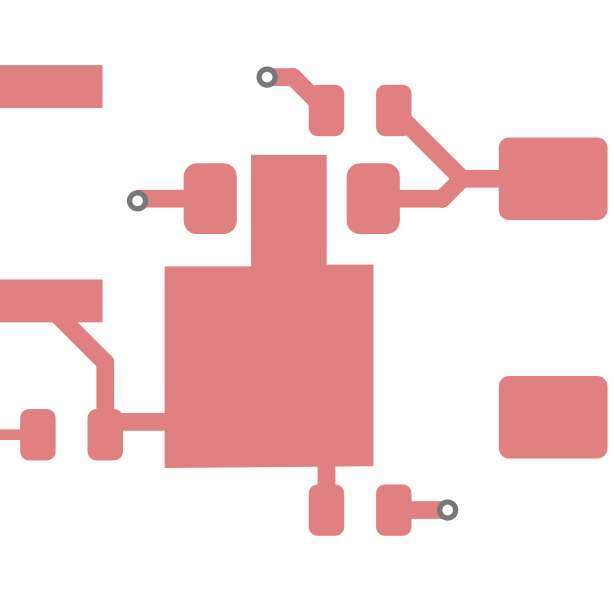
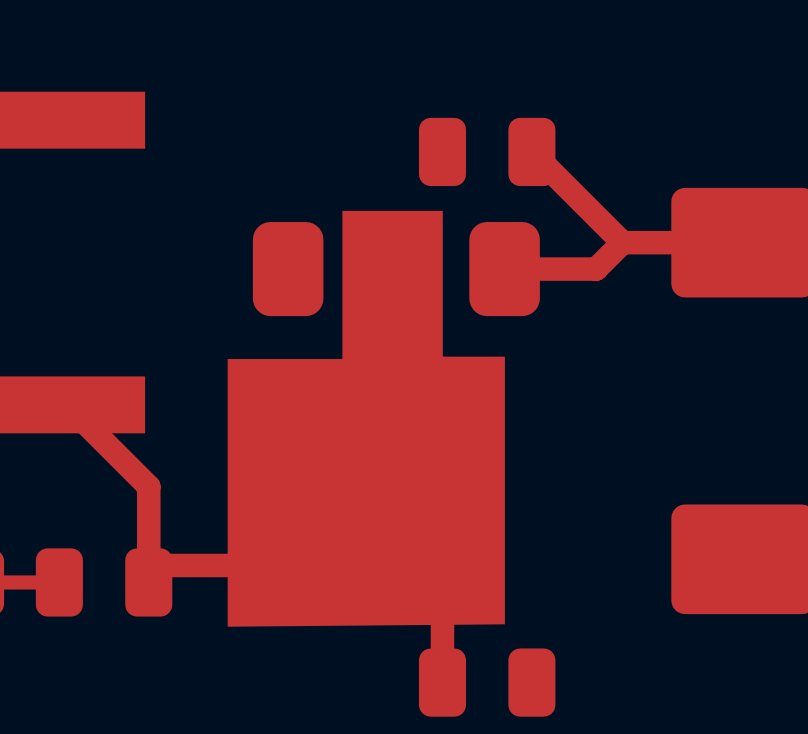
top track: (267, 77) (293, 77) (326, 110) -> none
via: (267, 77) -> none
top track: (210, 198) (139, 198) (137, 200) -> none
via: (137, 200) -> none
top track: (447, 510) (393, 510) -> none
via: (447, 510) -> none

